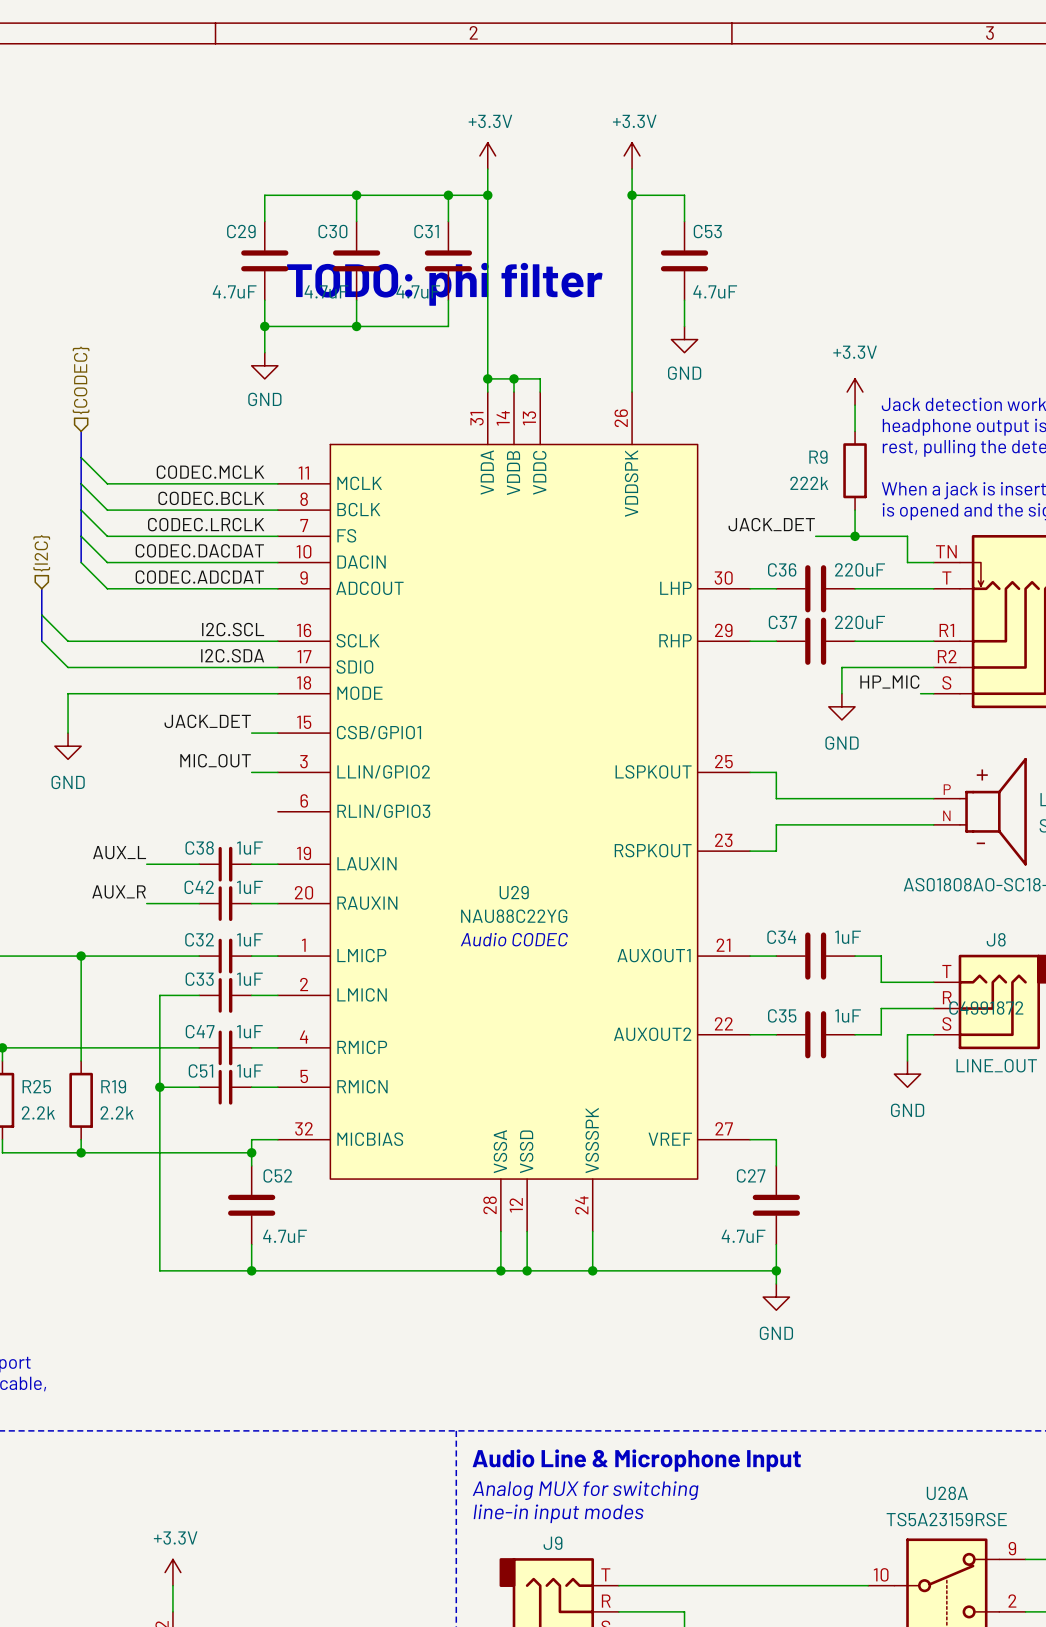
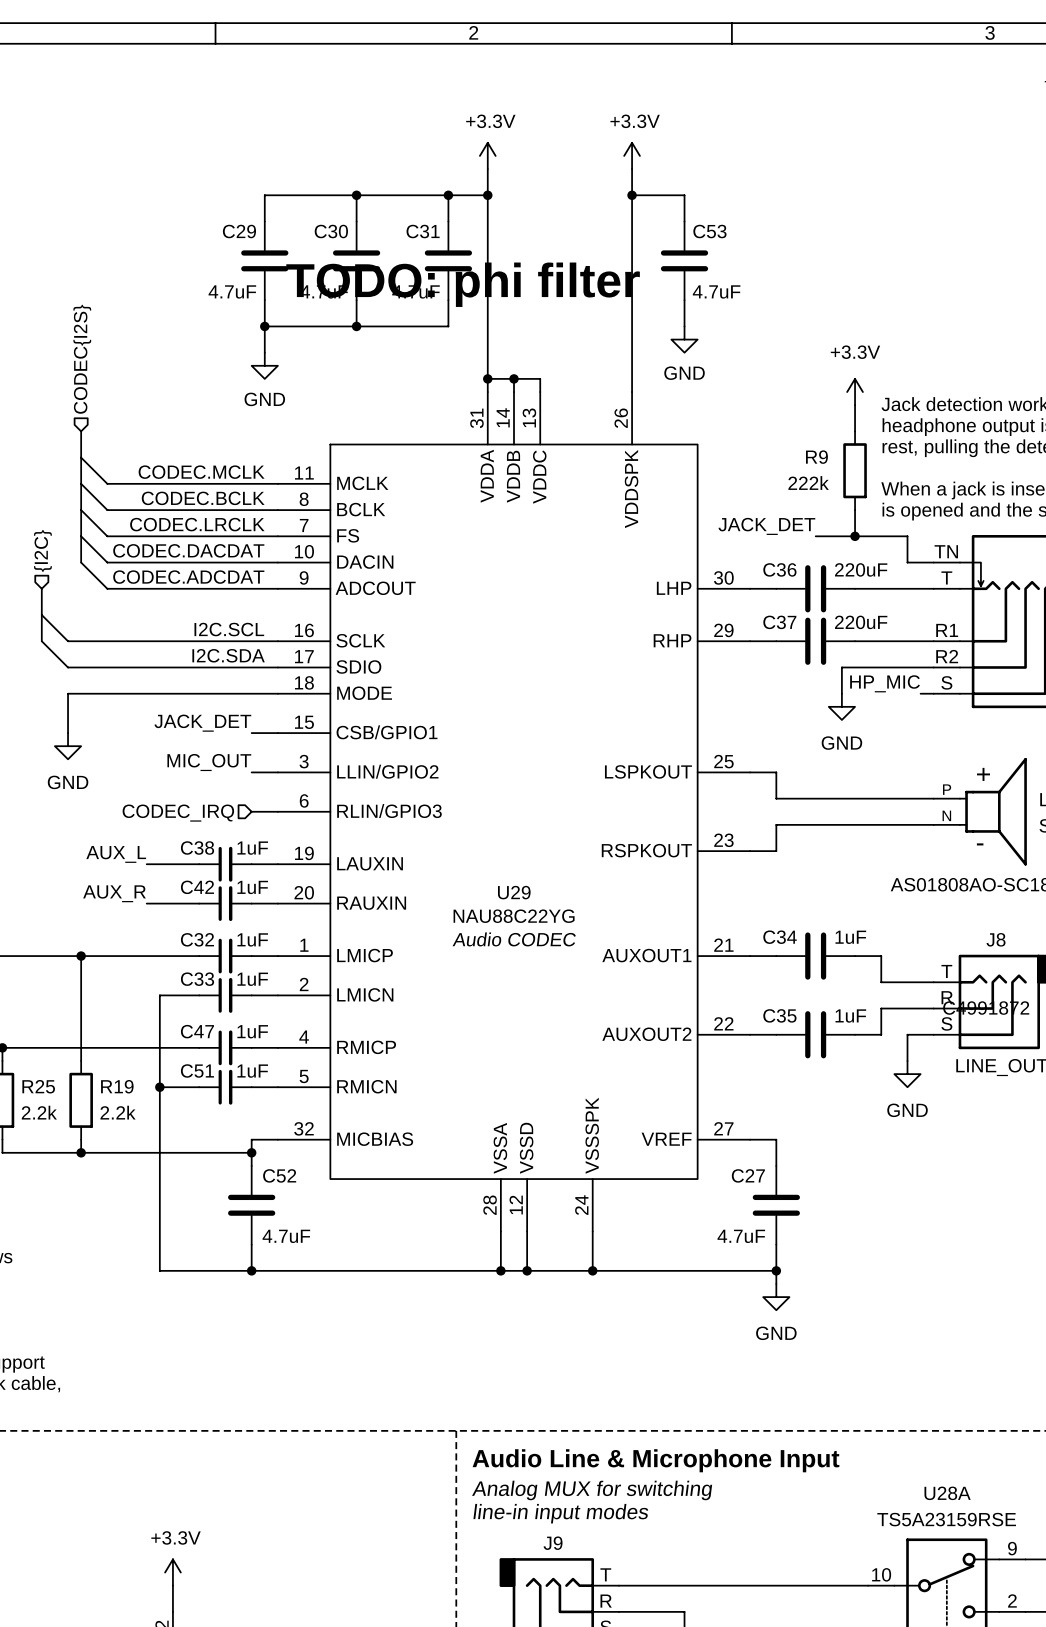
hierarchical label: {CODEC} (81, 380) -> CODEC{I2S} (82, 359)
wire: none -> (251, 811) (277, 811)
hierarchical label: none -> CODEC_IRQ (178, 813)

